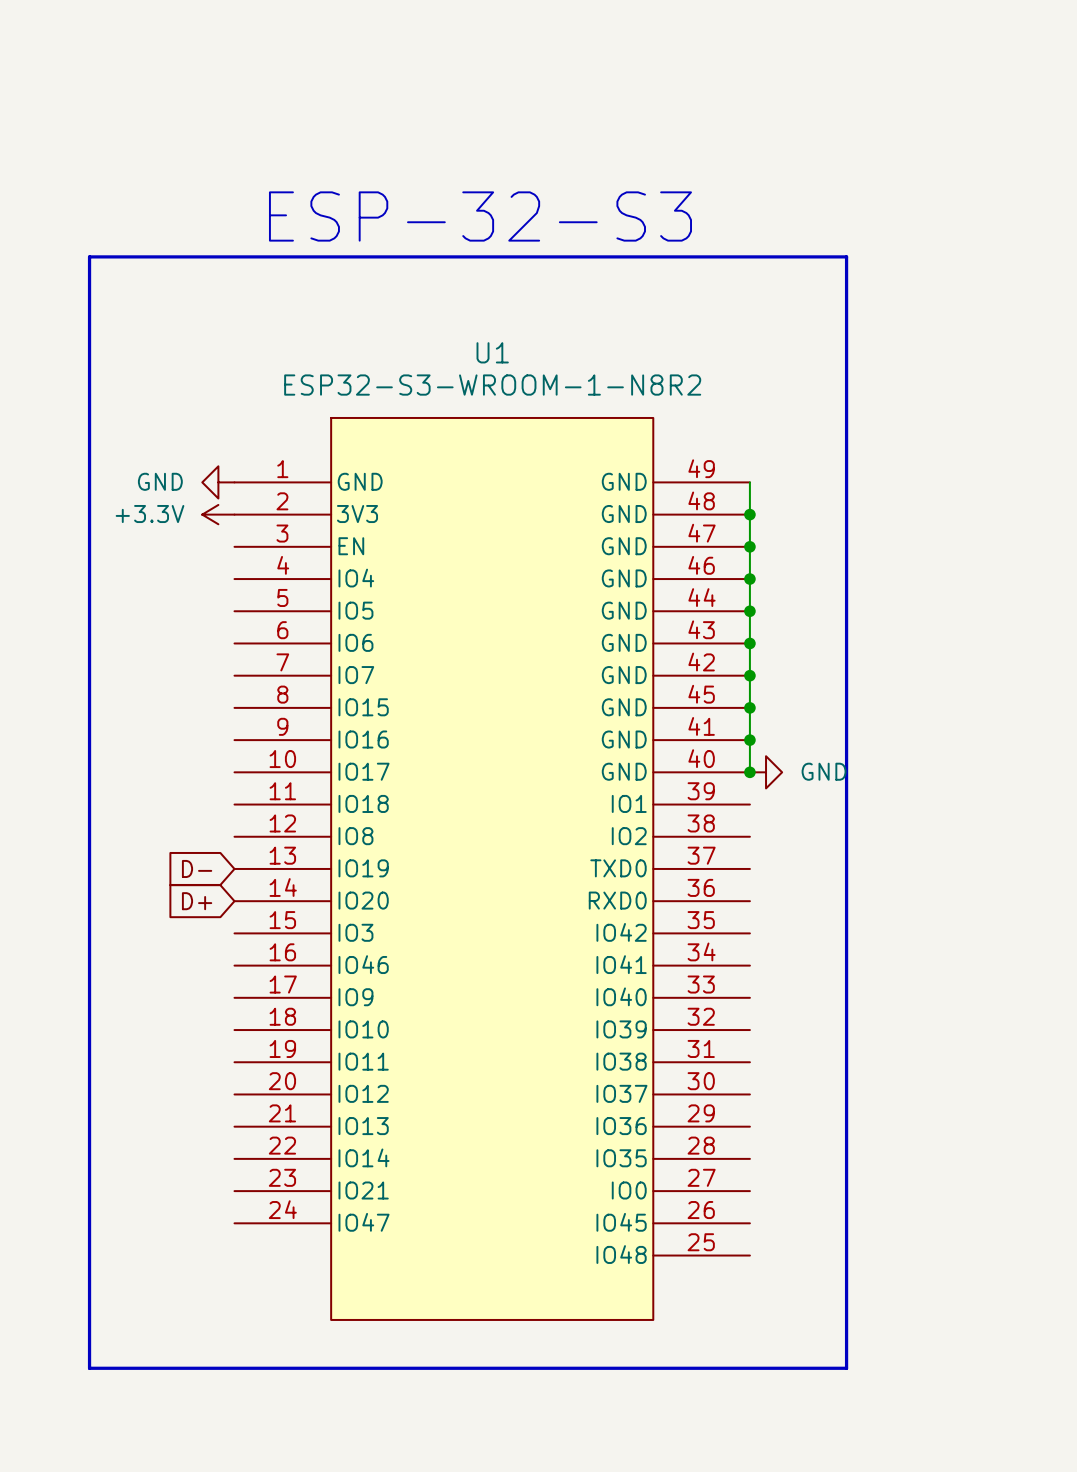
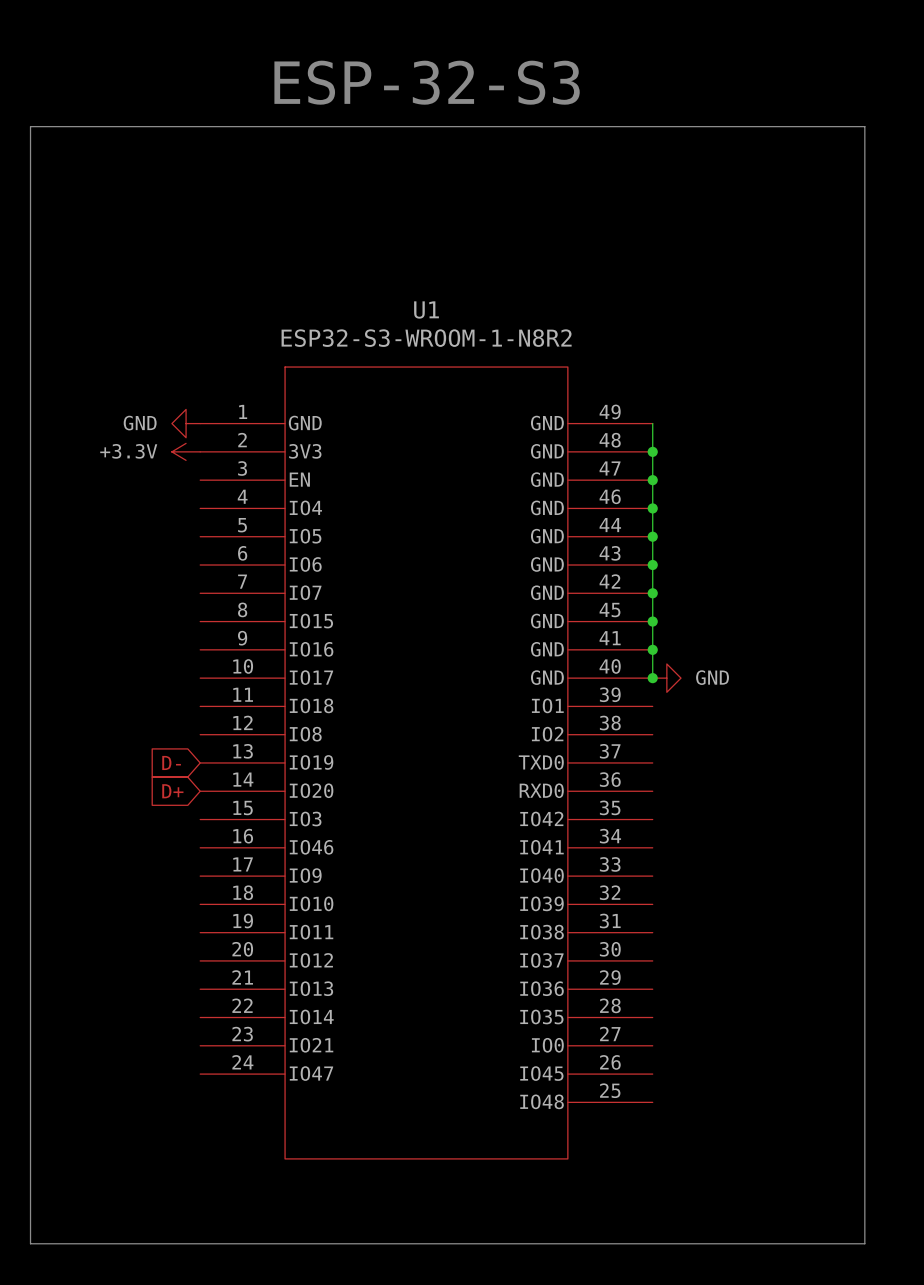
text position: ESP-32-S3 (480, 216) -> ESP-32-S3 (427, 82)
line: (89, 256) (846, 256) (846, 1368) (89, 1368) (89, 256) -> (30, 126) (30, 1243) (864, 1243) (864, 126) (30, 126)

